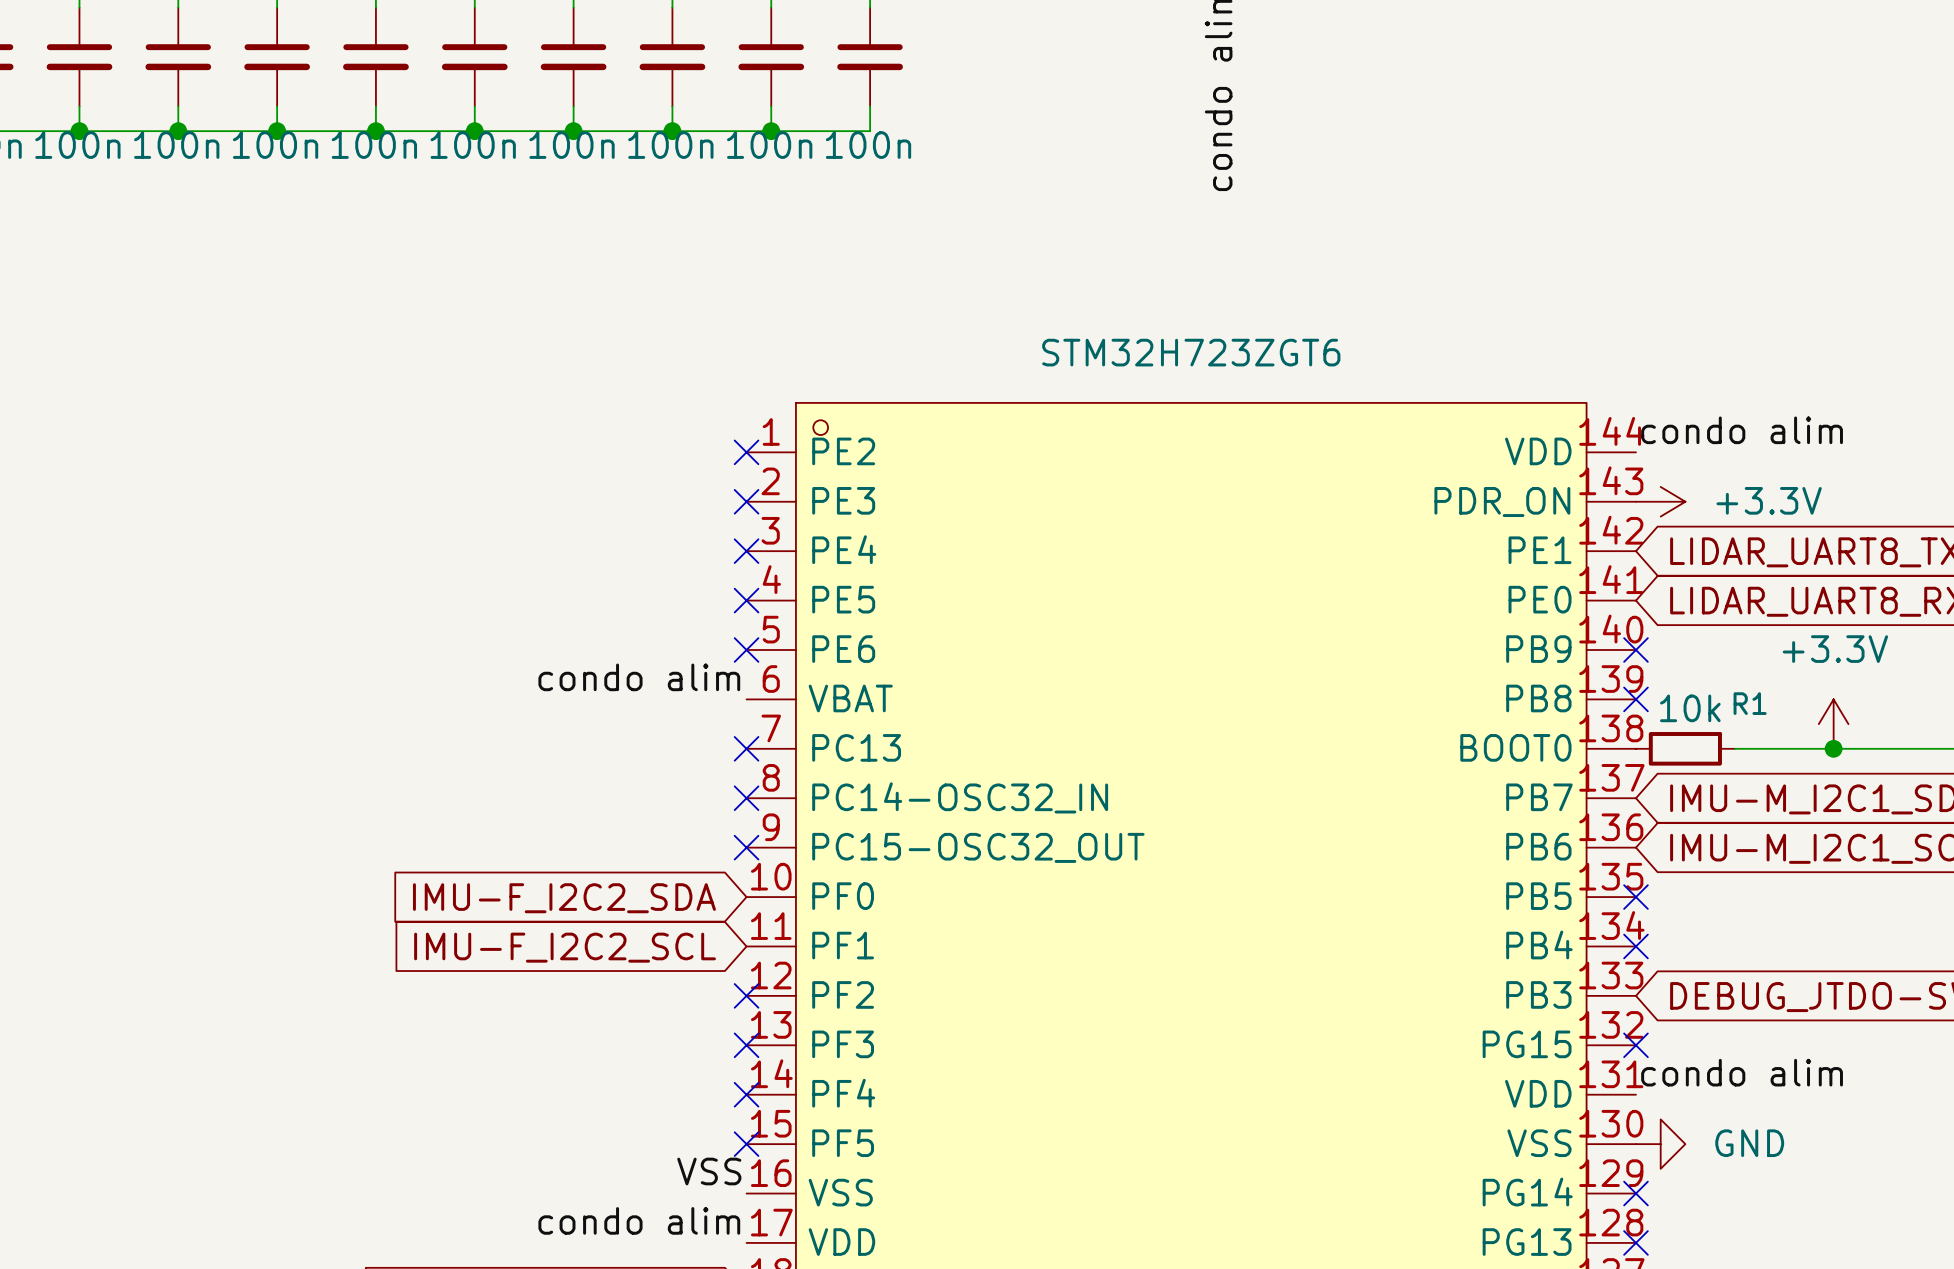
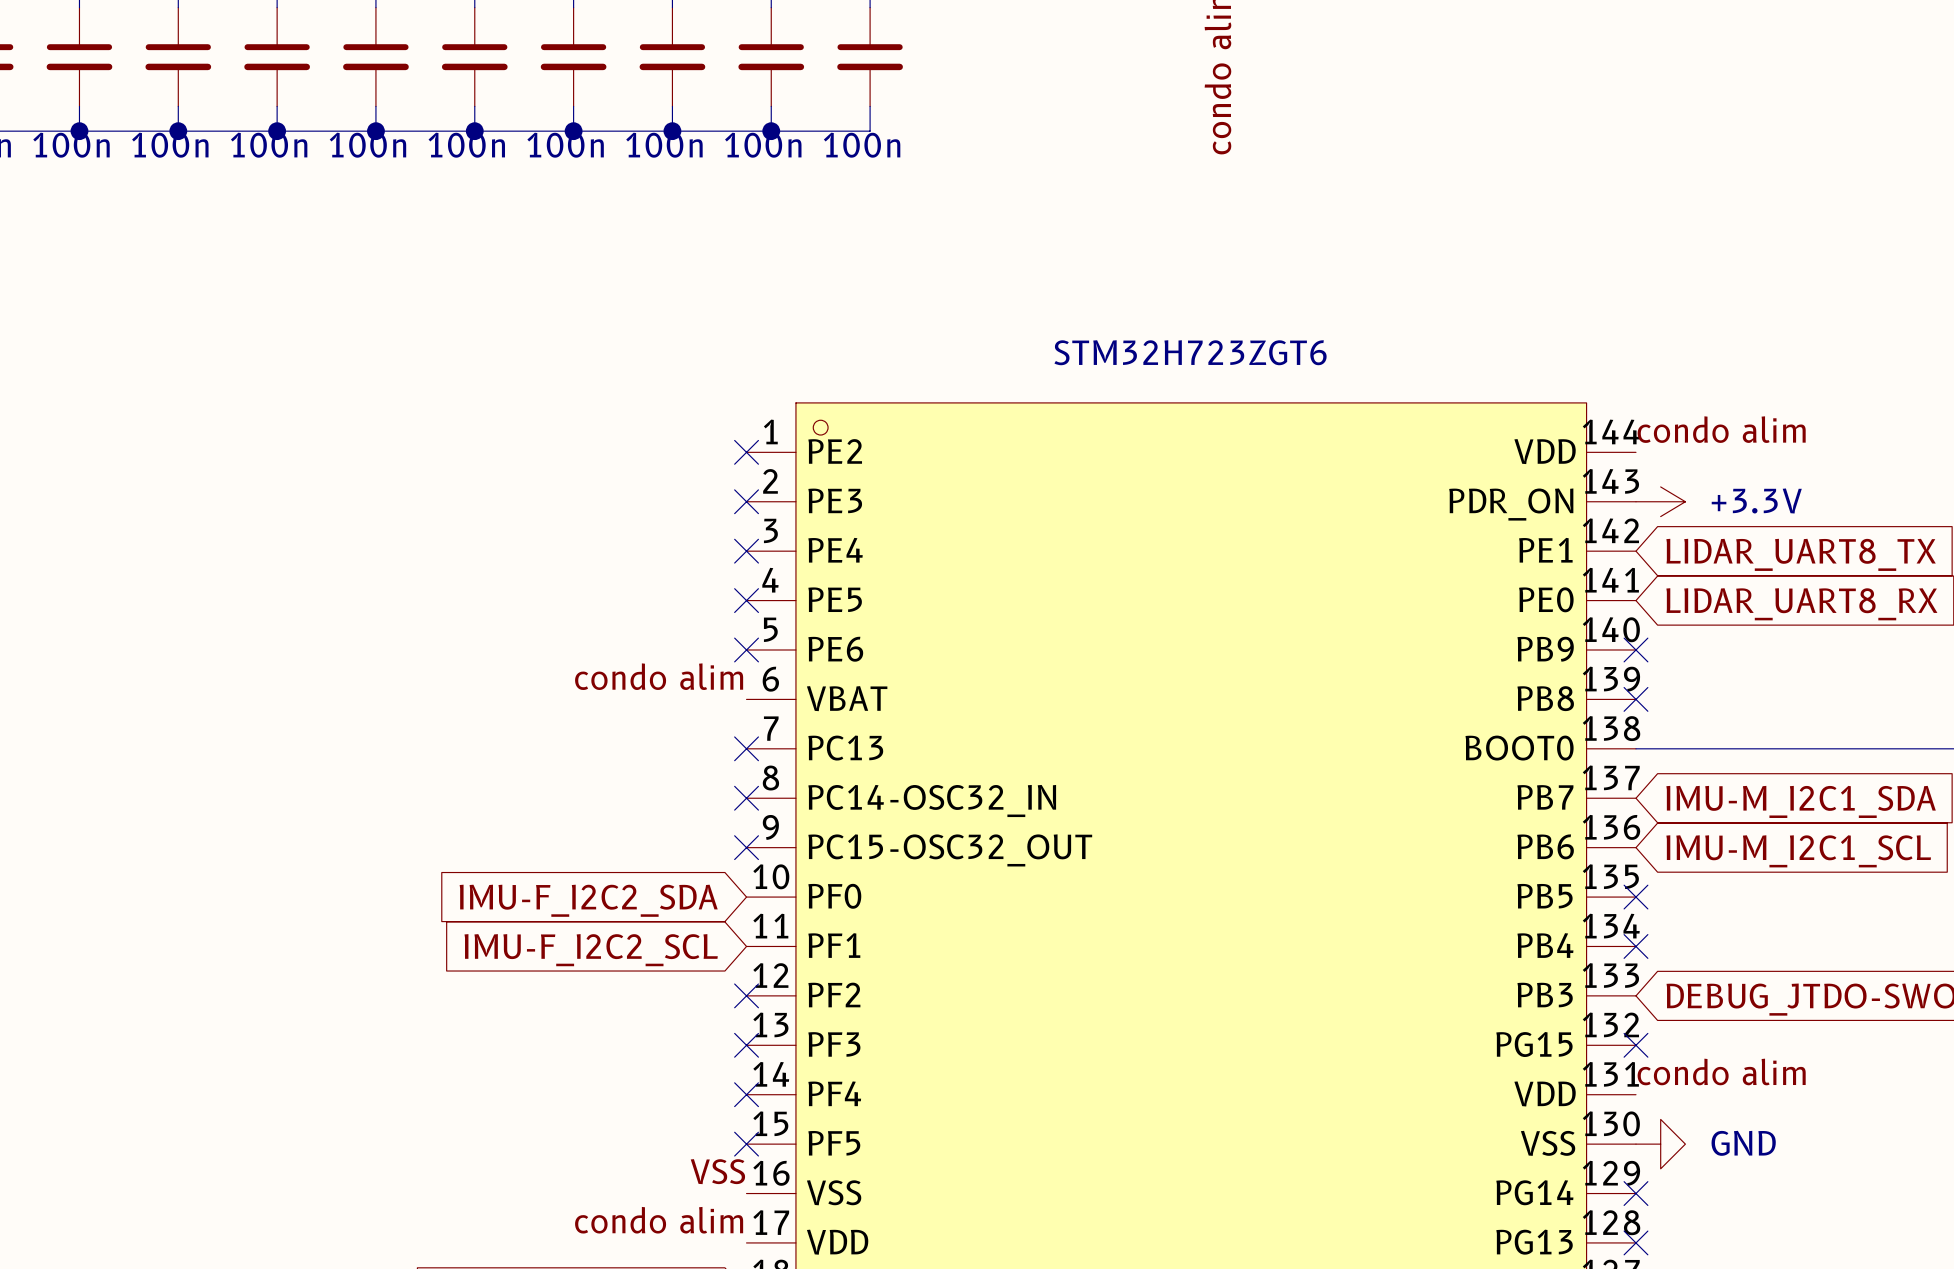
power symbol: +3.3V (1833, 724) -> none
wire: none -> (1635, 748) (1734, 748)
R1: 10k (1685, 748) -> none
junction: (1833, 748) -> none

